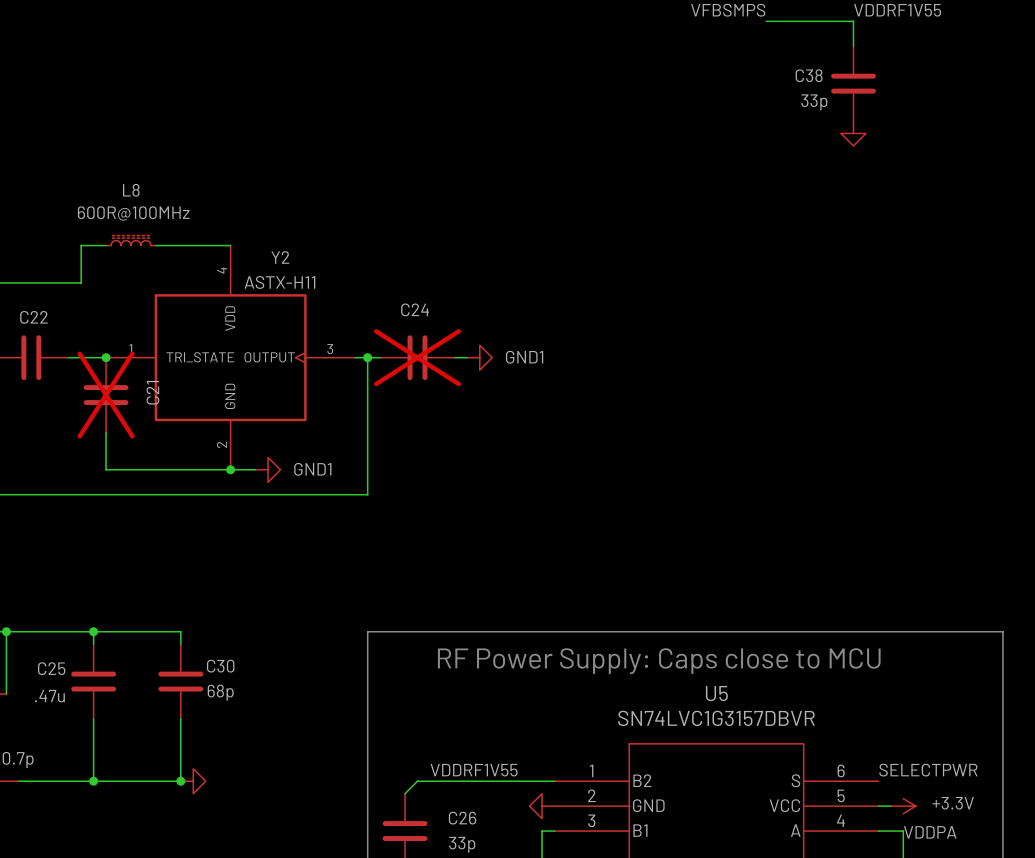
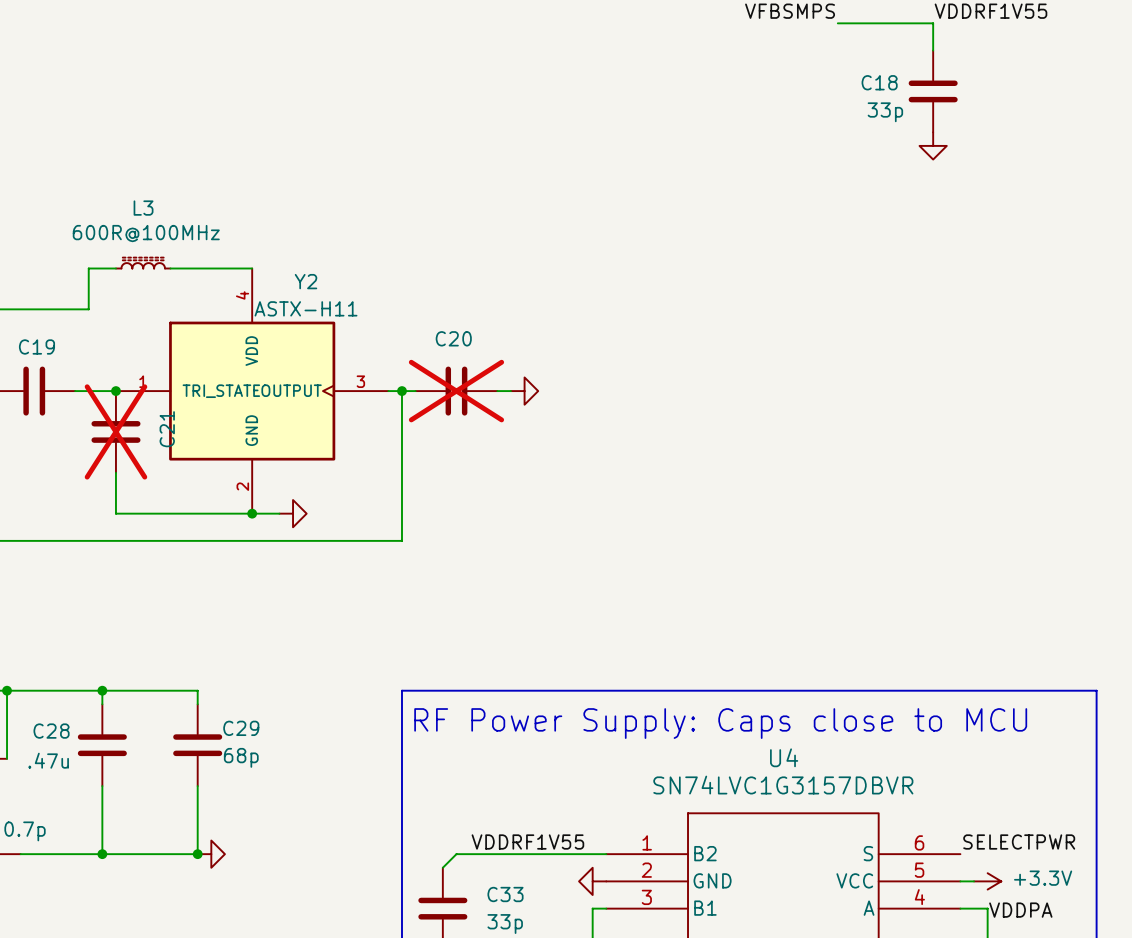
C38 name: C38 (809, 75) -> C18 (879, 82)
L8 name: L8 (131, 190) -> L3 (143, 208)
C24 name: C24 (415, 309) -> C20 (453, 338)
C22 name: C22 (33, 317) -> C19 (36, 346)
power symbol text: GND1 (524, 357) -> none
power symbol text: GND1 (312, 469) -> none
C30 name: C30 (220, 666) -> C29 (241, 728)
C25 name: C25 (51, 668) -> C28 (51, 731)
U5 name: U5 (716, 693) -> U4 (784, 757)
C26 name: C26 (462, 818) -> C33 (505, 894)

